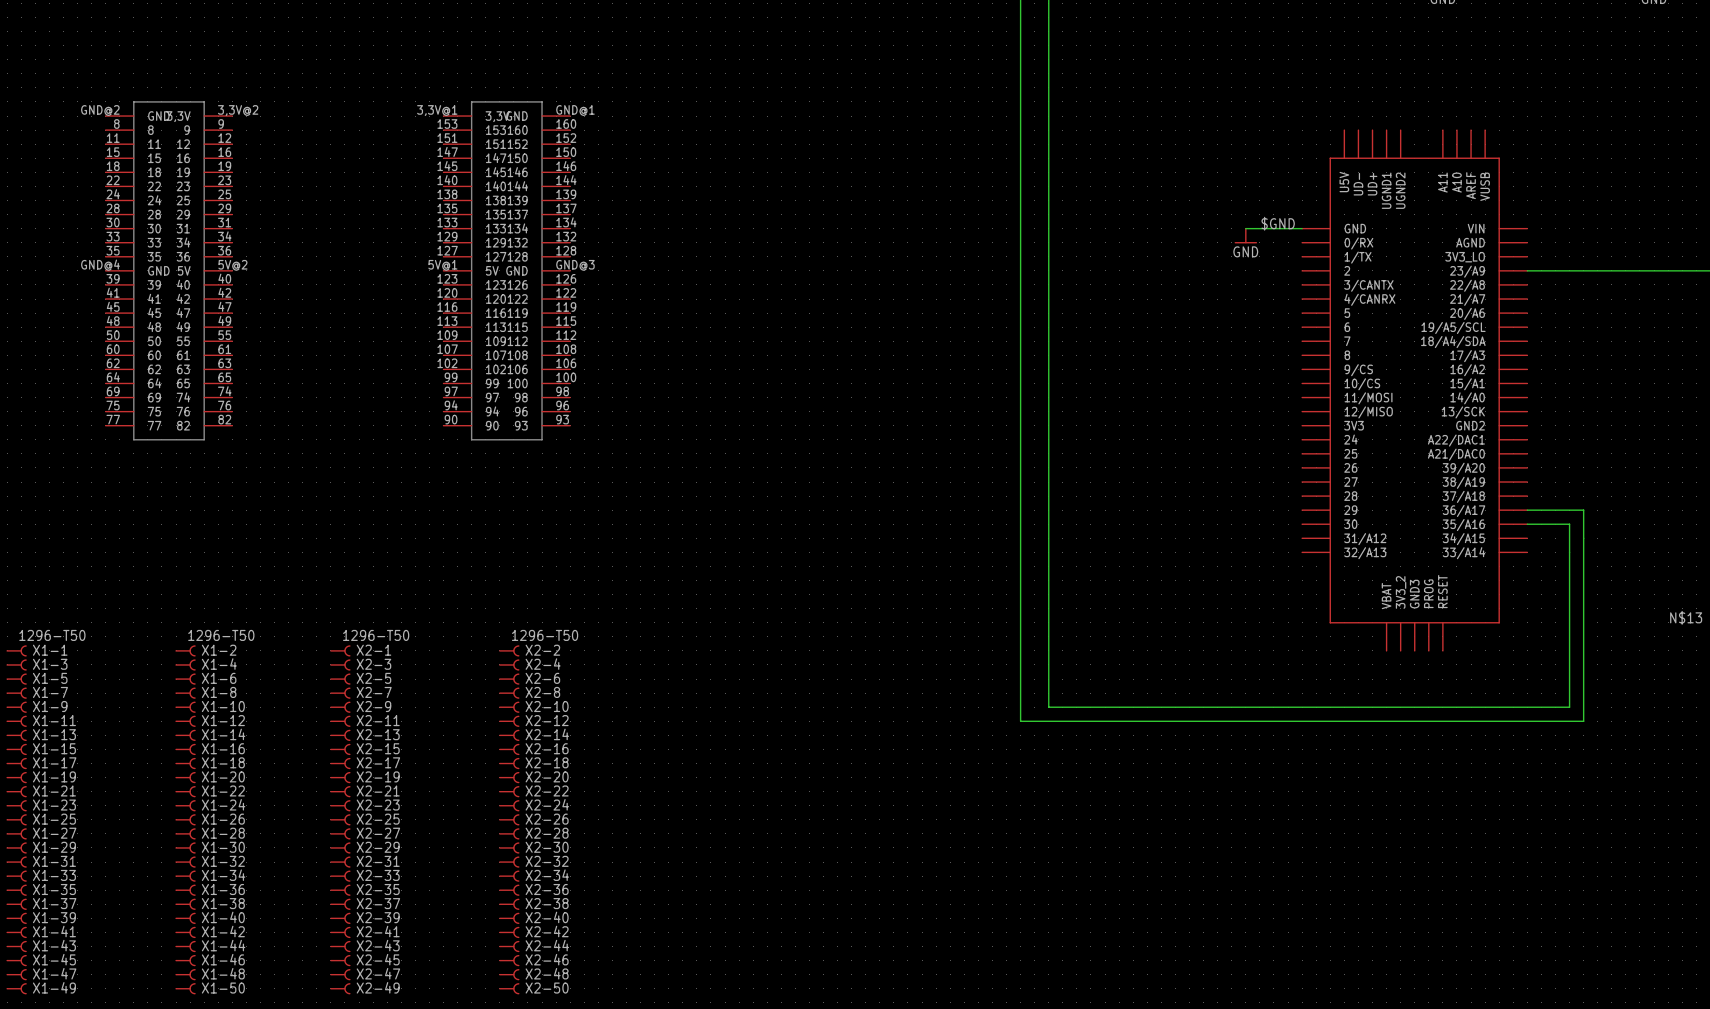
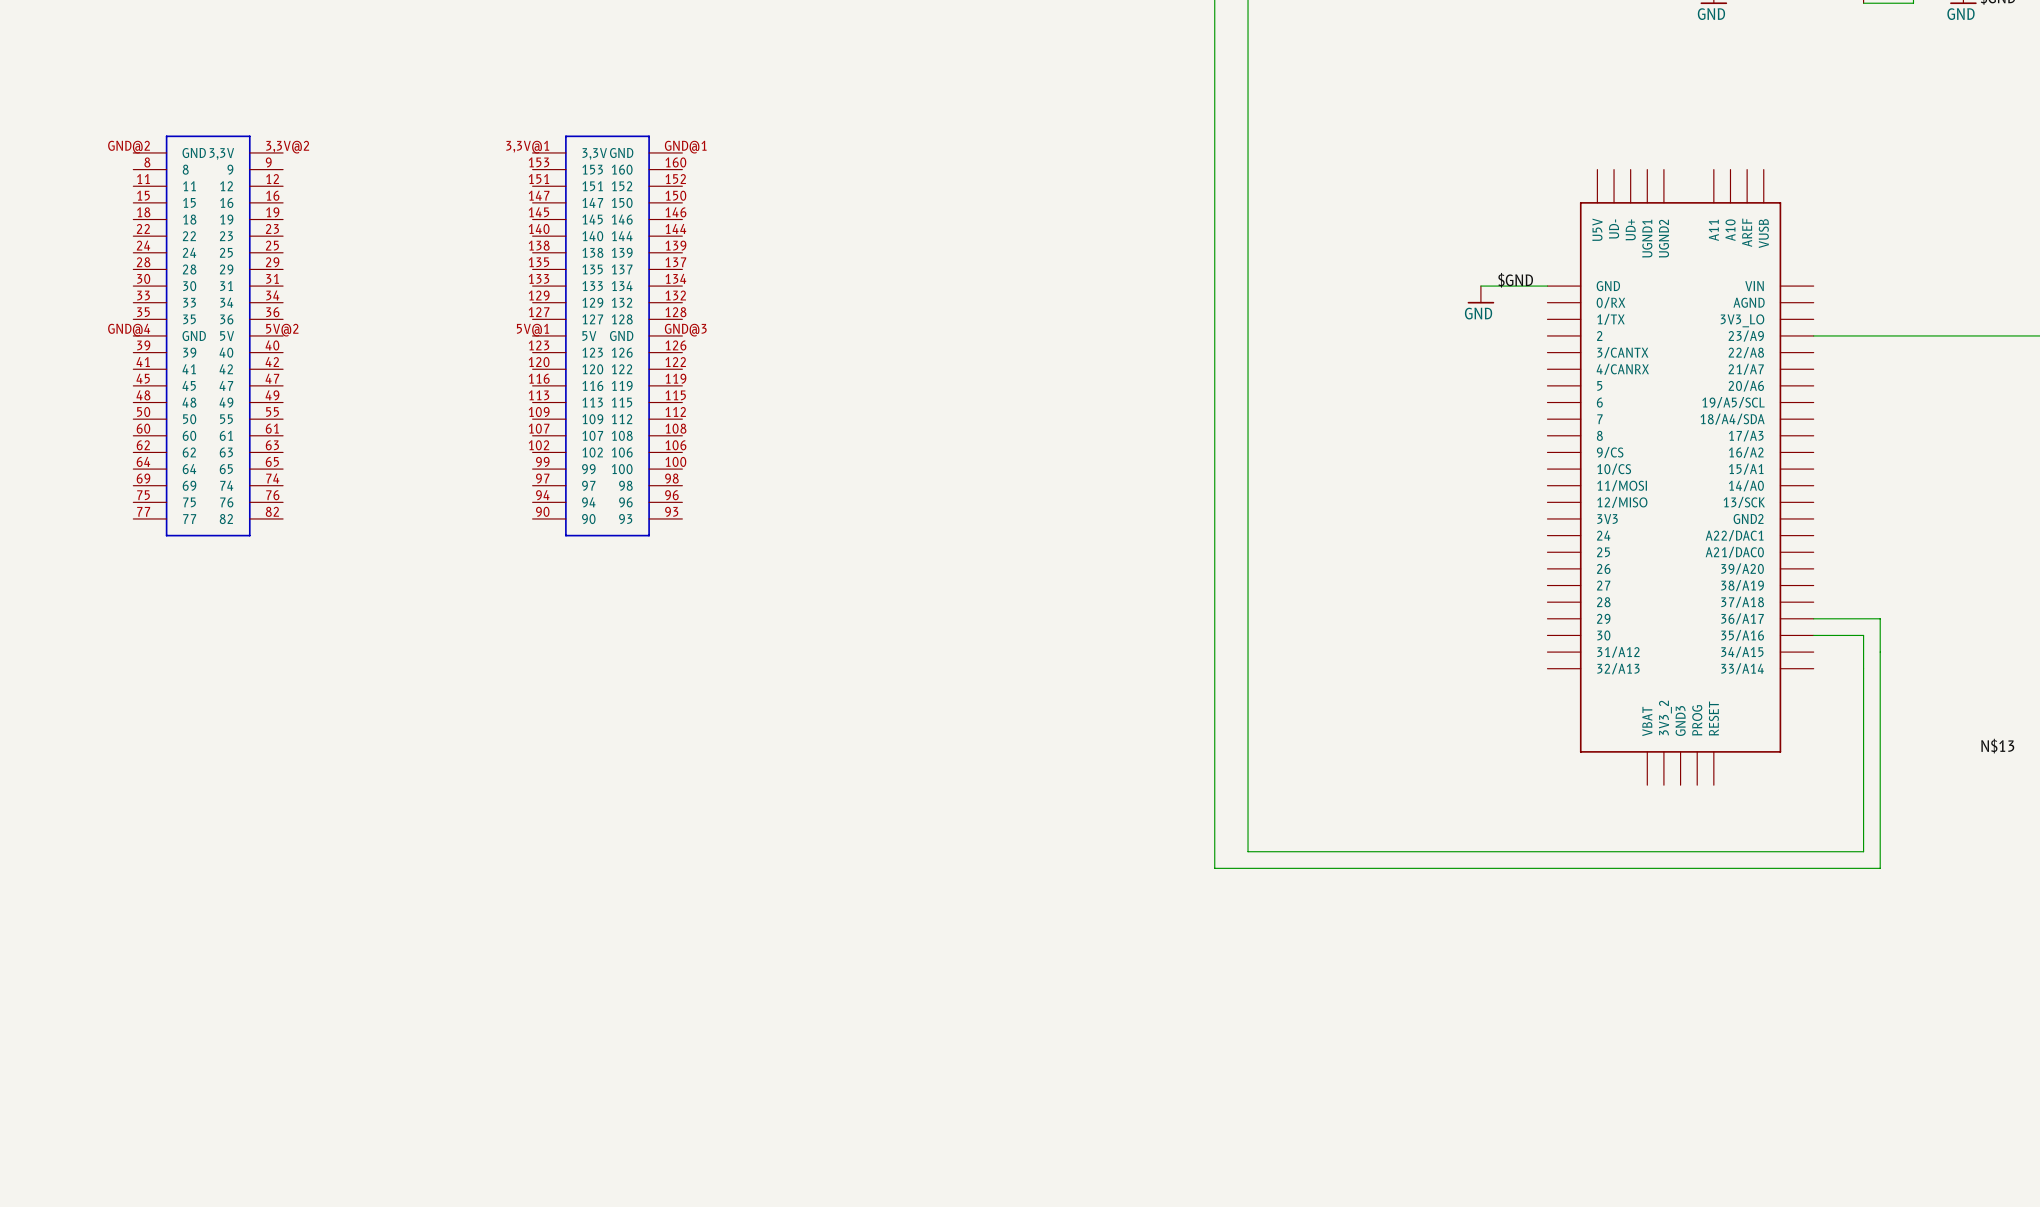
X1-1: 1296-T50 (16, 650) -> none
X1-2: 1296-T50 (185, 650) -> none
X2-1: 1296-T50 (340, 650) -> none
X2-2: 1296-T50 (509, 650) -> none
X1-3: (16, 664) -> none
X1-4: (185, 664) -> none
X2-3: (340, 664) -> none
X2-4: (509, 664) -> none
X1-5: (16, 679) -> none
X1-6: (185, 679) -> none
X2-5: (340, 679) -> none
X2-6: (509, 679) -> none
X1-7: (16, 693) -> none
X1-8: (185, 693) -> none
X2-7: (340, 693) -> none
X2-8: (509, 693) -> none
X1-9: (16, 707) -> none
X1-10: (185, 707) -> none
X2-9: (340, 707) -> none
X2-10: (509, 707) -> none
X1-11: (16, 721) -> none
X1-12: (185, 721) -> none
X2-11: (340, 721) -> none
X2-12: (509, 721) -> none
X1-13: (16, 735) -> none
X1-14: (185, 735) -> none
X2-13: (340, 735) -> none
X2-14: (509, 735) -> none
X1-15: (16, 749) -> none
X1-16: (185, 749) -> none
X2-15: (340, 749) -> none
X2-16: (509, 749) -> none
X1-17: (16, 763) -> none
X1-18: (185, 763) -> none
X2-17: (340, 763) -> none
X2-18: (509, 763) -> none
X1-19: (16, 777) -> none
X1-20: (185, 777) -> none
X2-19: (340, 777) -> none
X2-20: (509, 777) -> none
X1-21: (16, 791) -> none
X1-22: (185, 791) -> none
X2-21: (340, 791) -> none
X2-22: (509, 791) -> none
X1-23: (16, 805) -> none
X1-24: (185, 805) -> none
X2-23: (340, 805) -> none
X2-24: (509, 805) -> none
X1-25: (16, 819) -> none
X1-26: (185, 819) -> none
X2-25: (340, 819) -> none
X2-26: (509, 819) -> none
X1-27: (16, 833) -> none
X1-28: (185, 833) -> none
X2-27: (340, 833) -> none
X2-28: (509, 833) -> none
X1-29: (16, 847) -> none
X1-30: (185, 847) -> none
X2-29: (340, 847) -> none
X2-30: (509, 847) -> none
X1-31: (16, 862) -> none
X1-32: (185, 862) -> none
X2-31: (340, 862) -> none
X2-32: (509, 862) -> none
X1-33: (16, 876) -> none
X1-34: (185, 876) -> none
X2-33: (340, 876) -> none
X2-34: (509, 876) -> none
X1-35: (16, 890) -> none
X1-36: (185, 890) -> none
X2-35: (340, 890) -> none
X2-36: (509, 890) -> none
X1-37: (16, 904) -> none
X1-38: (185, 904) -> none
X2-37: (340, 904) -> none
X2-38: (509, 904) -> none
X1-39: (16, 918) -> none
X1-40: (185, 918) -> none
X2-39: (340, 918) -> none
X2-40: (509, 918) -> none
X1-41: (16, 932) -> none
X1-42: (185, 932) -> none
X2-41: (340, 932) -> none
X2-42: (509, 932) -> none
X1-43: (16, 946) -> none
X1-44: (185, 946) -> none
X2-43: (340, 946) -> none
X2-44: (509, 946) -> none
X1-45: (16, 960) -> none
X1-46: (185, 960) -> none
X2-45: (340, 960) -> none
X2-46: (509, 960) -> none
X1-47: (16, 974) -> none
X1-48: (185, 974) -> none
X2-47: (340, 974) -> none
X2-48: (509, 974) -> none
X1-49: (16, 988) -> none
X1-50: (185, 988) -> none
X2-49: (340, 988) -> none
X2-50: (509, 988) -> none

